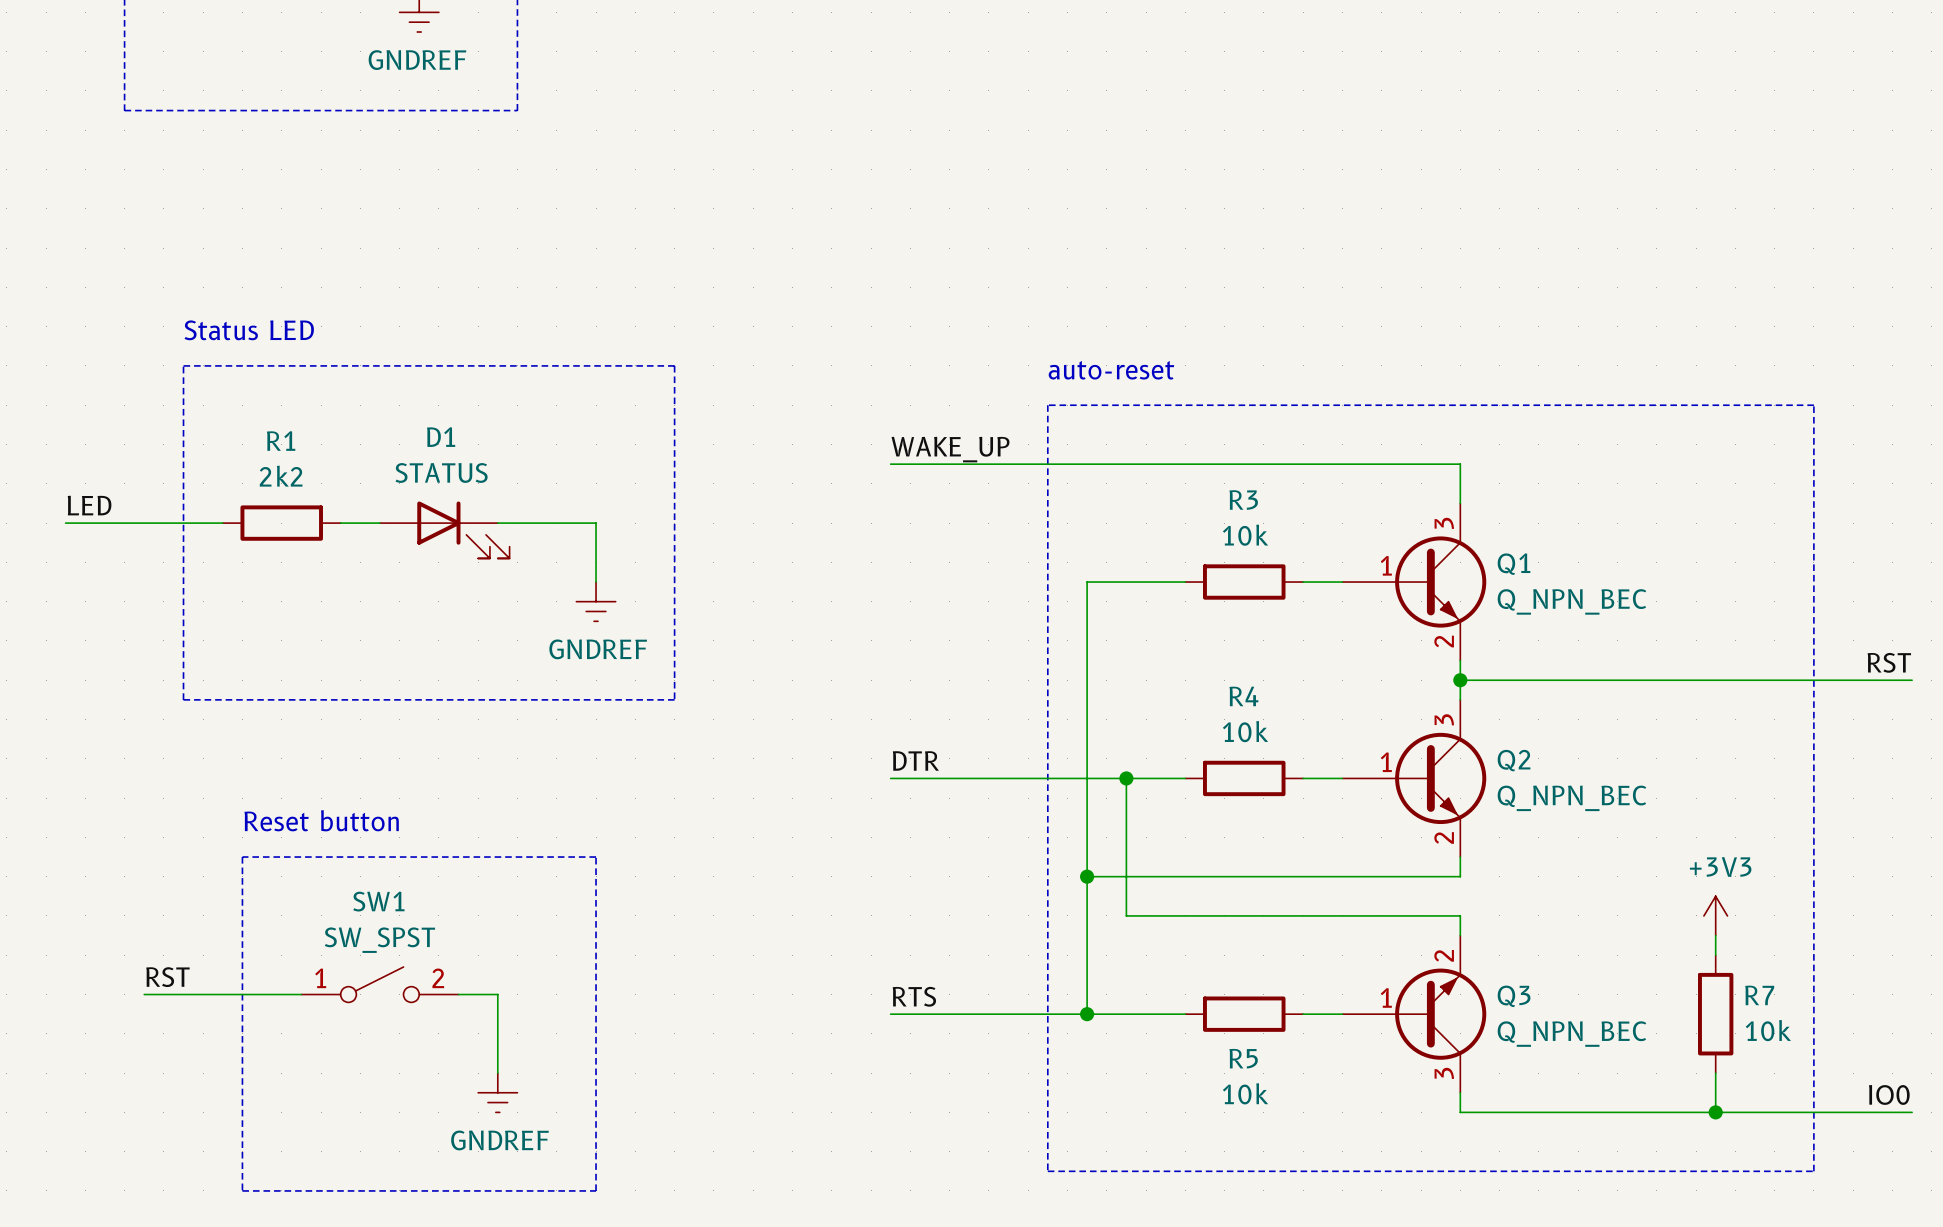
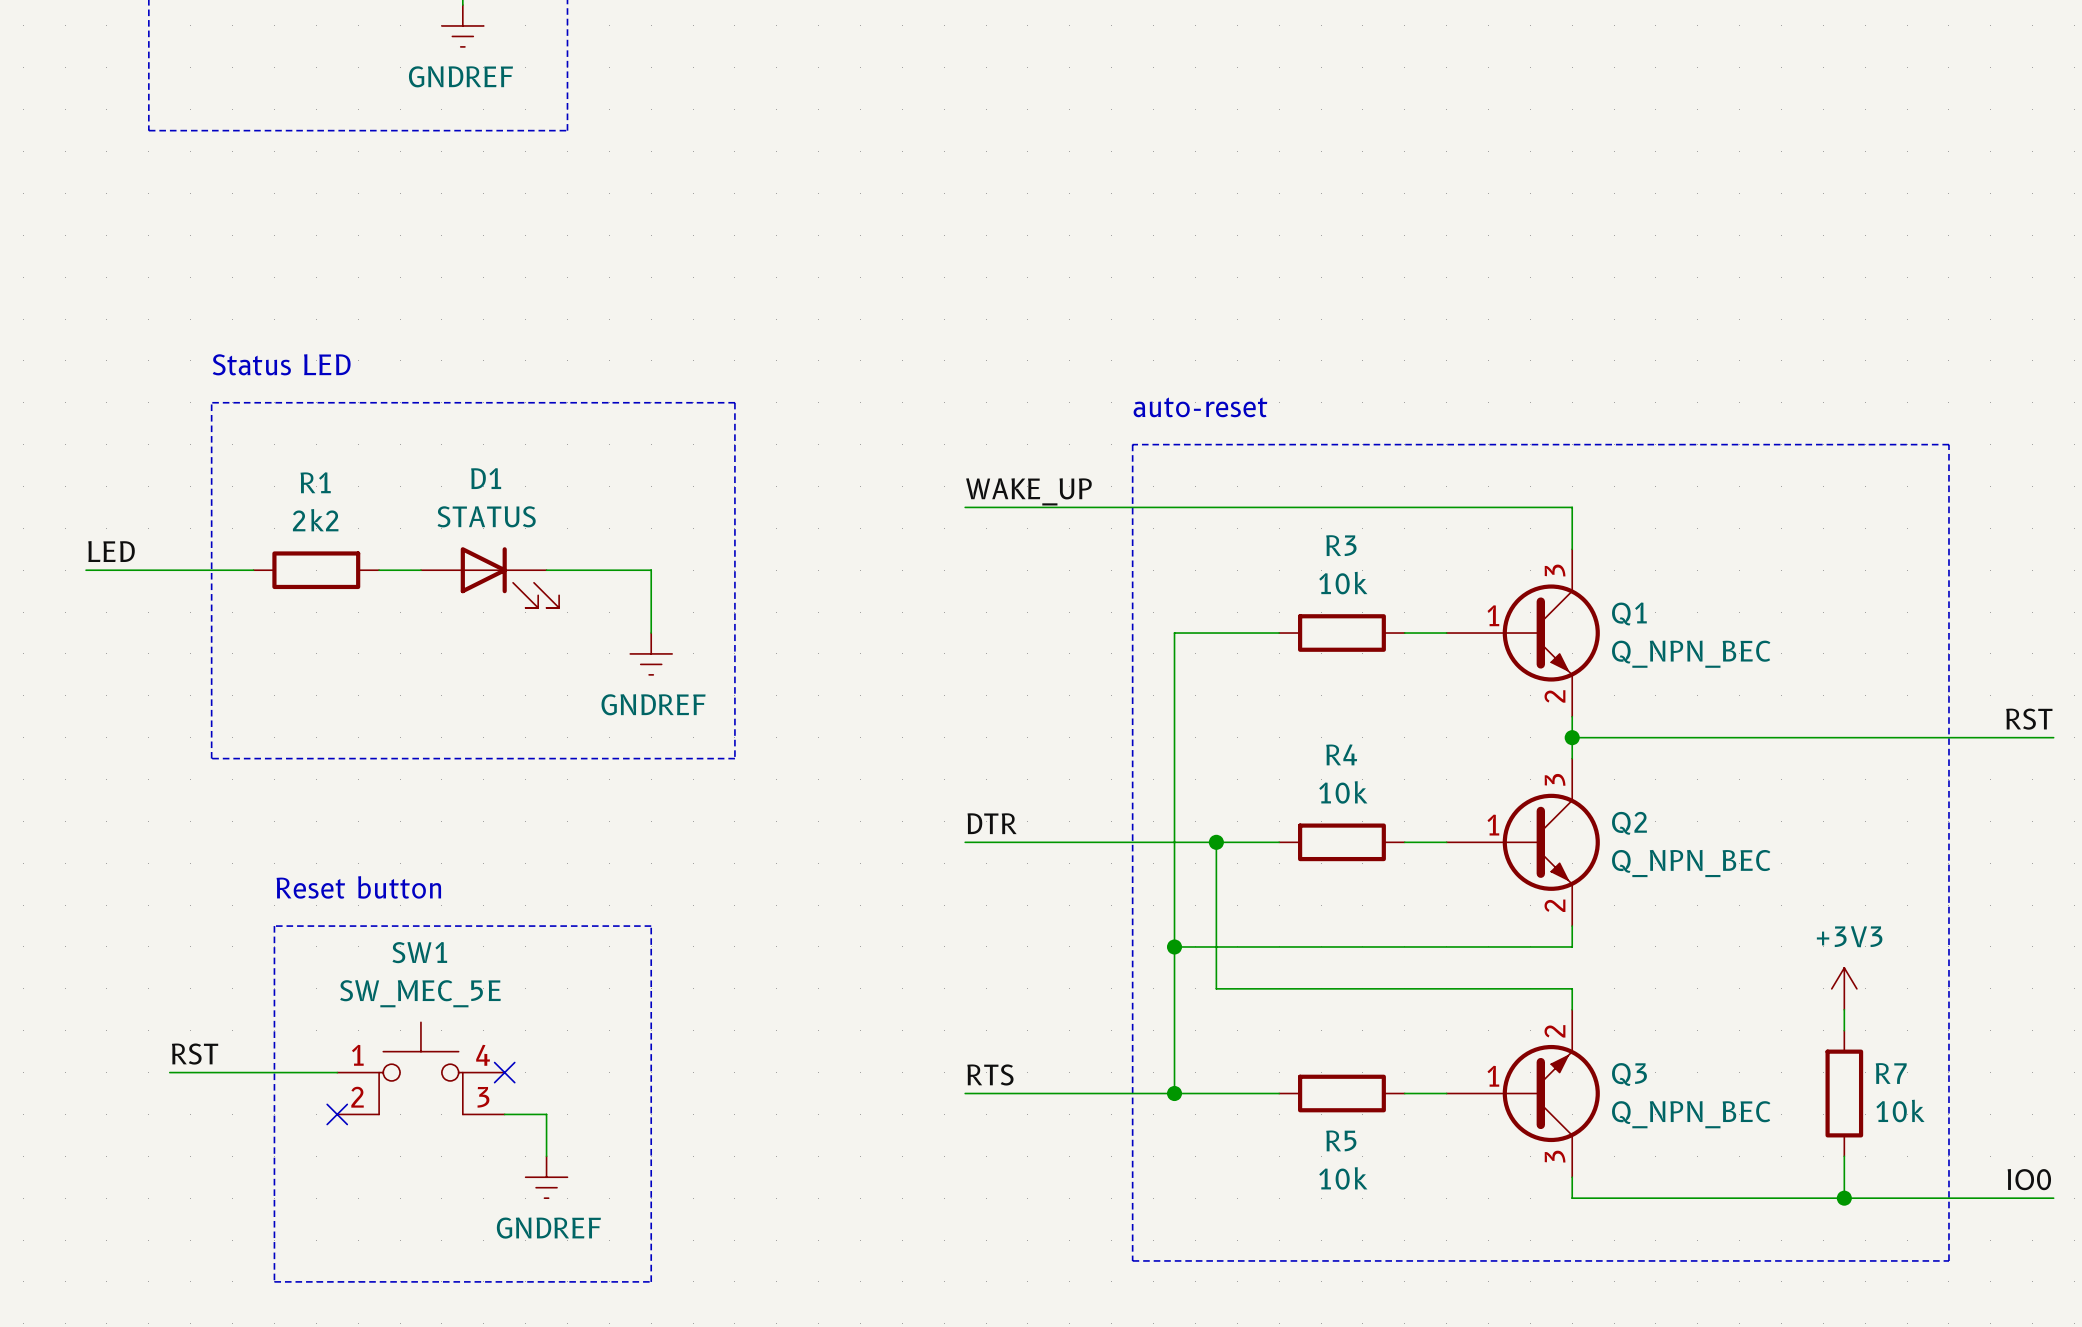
SW1 value: SW_SPST (379, 940) -> SW_MEC_5E (420, 993)
SW1 symbol: [301, 967, 459, 1003] -> [337, 1022, 505, 1115]
wire: (458, 994) (497, 994) (497, 1033) -> (504, 1114) (546, 1114)
no-connect mark: none -> (504, 1072)
no-connect mark: none -> (337, 1114)

